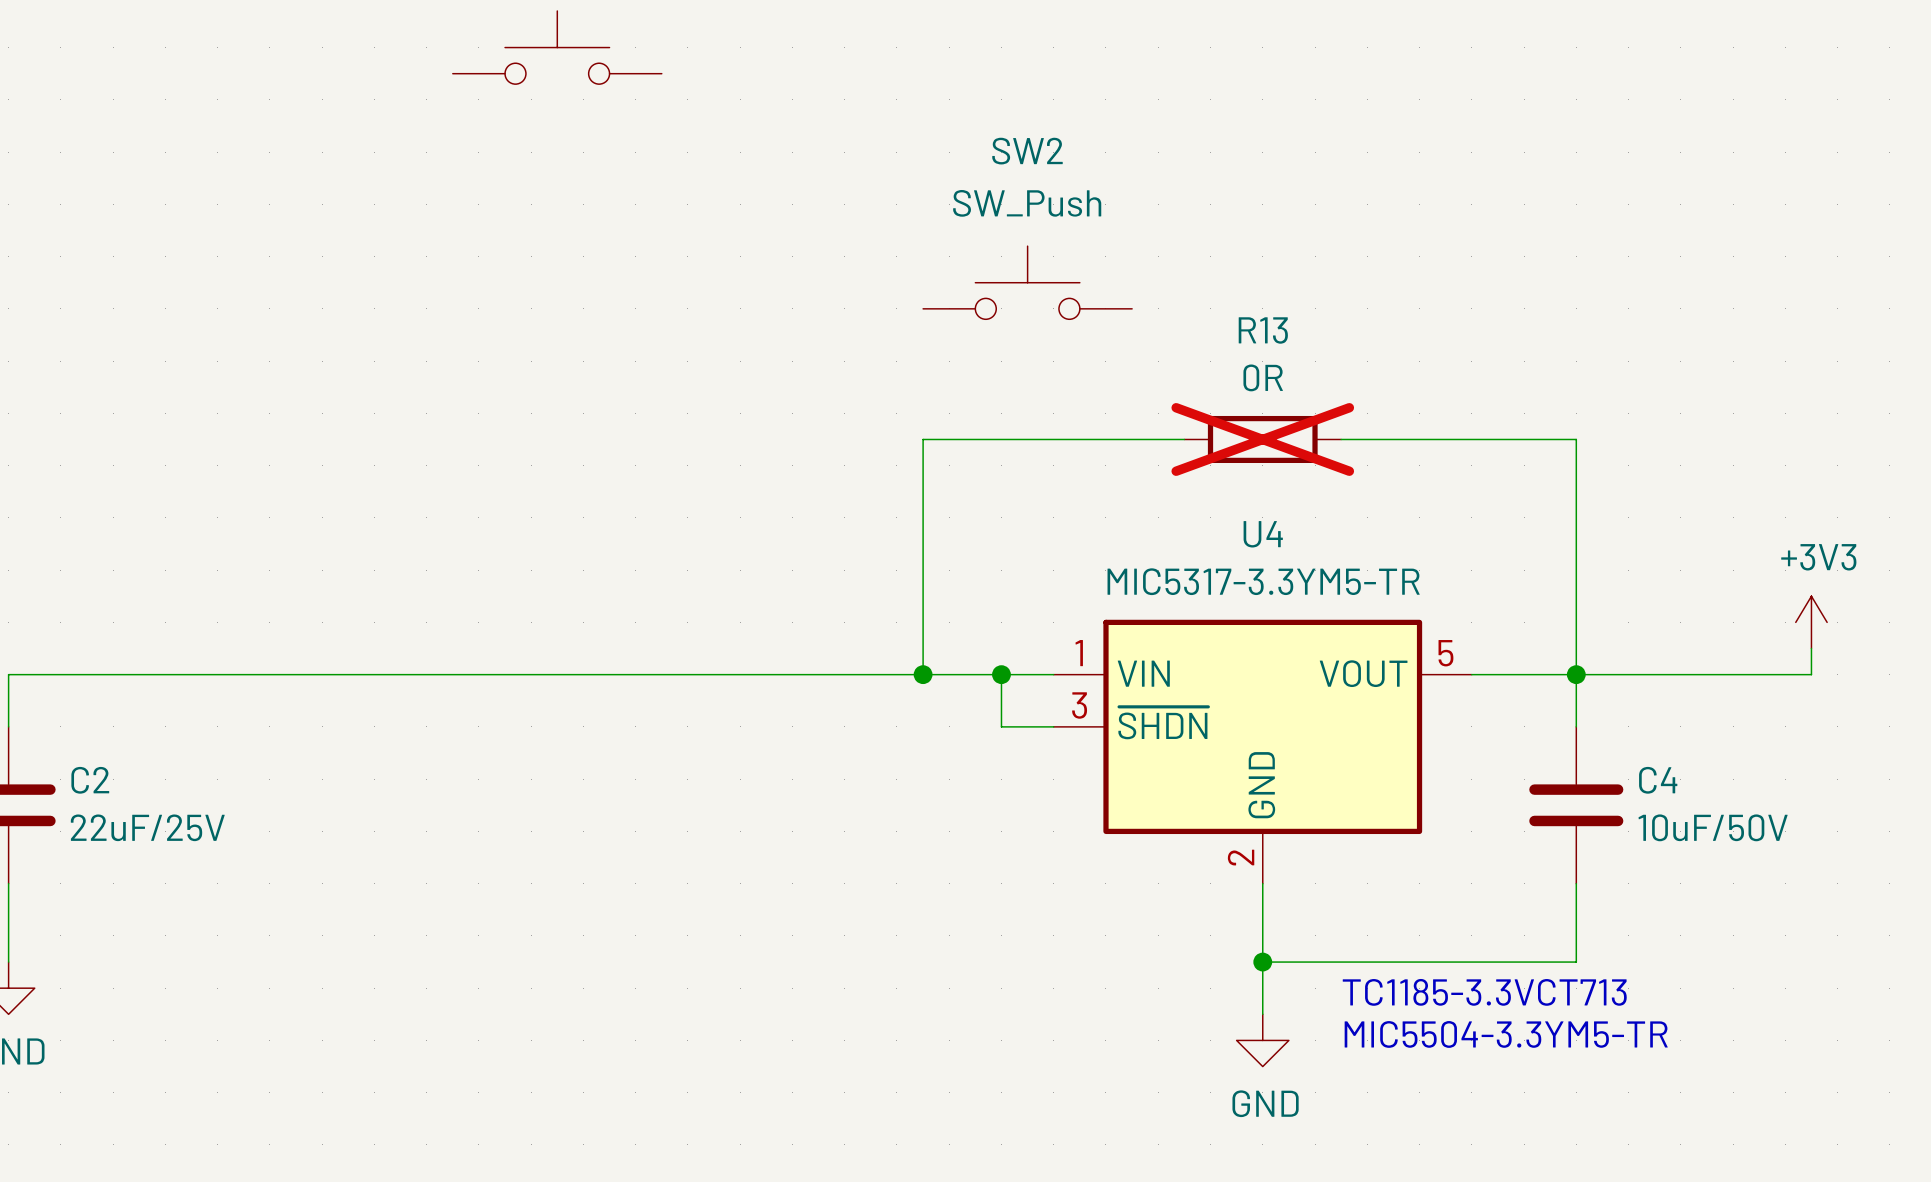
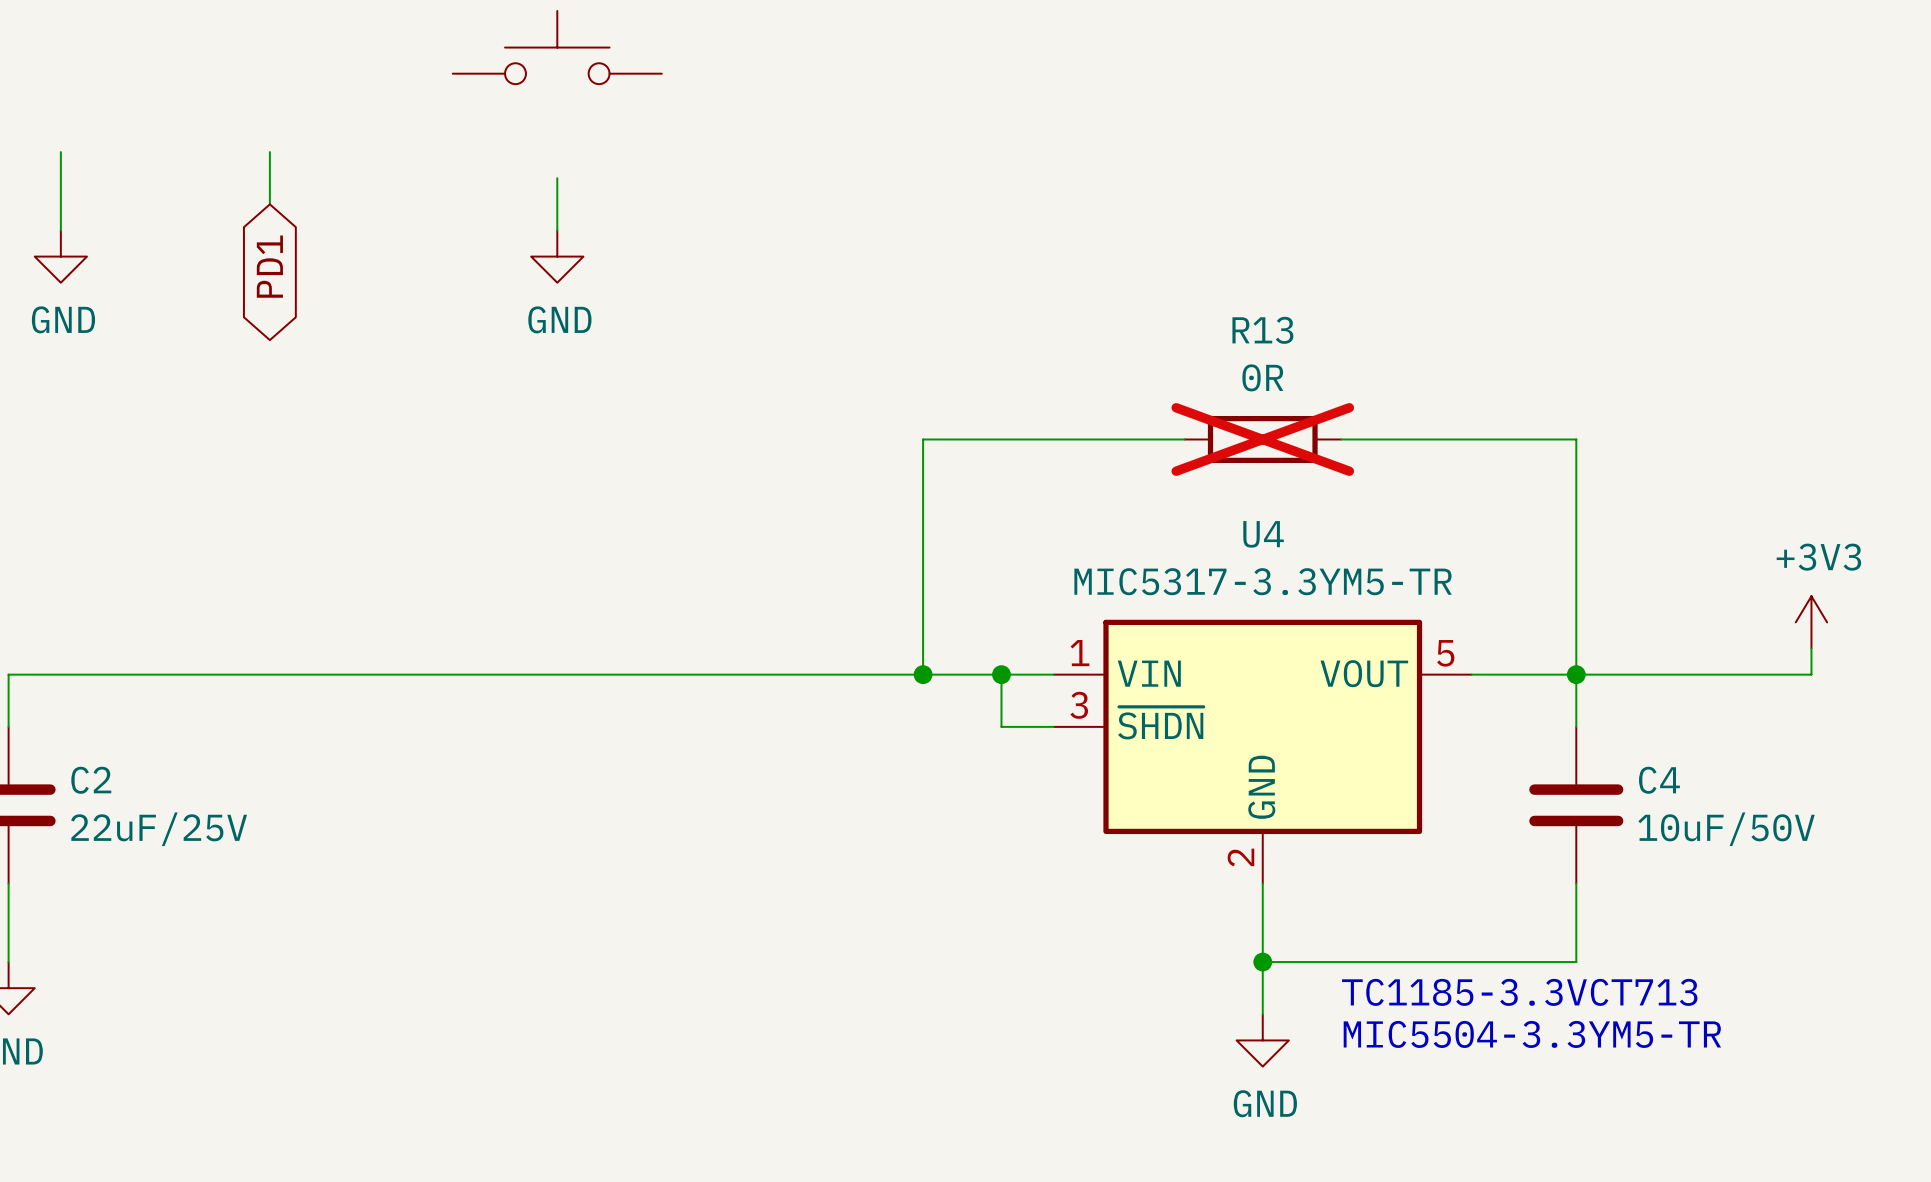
wire: none -> (60, 152) (60, 230)
wire: none -> (269, 152) (269, 204)
wire: none -> (557, 178) (557, 230)
power symbol: none -> GND (60, 256)
power symbol: none -> GND (557, 256)
global label: none -> PD1 (269, 266)
SW2: SW_Push (1027, 282) -> none

